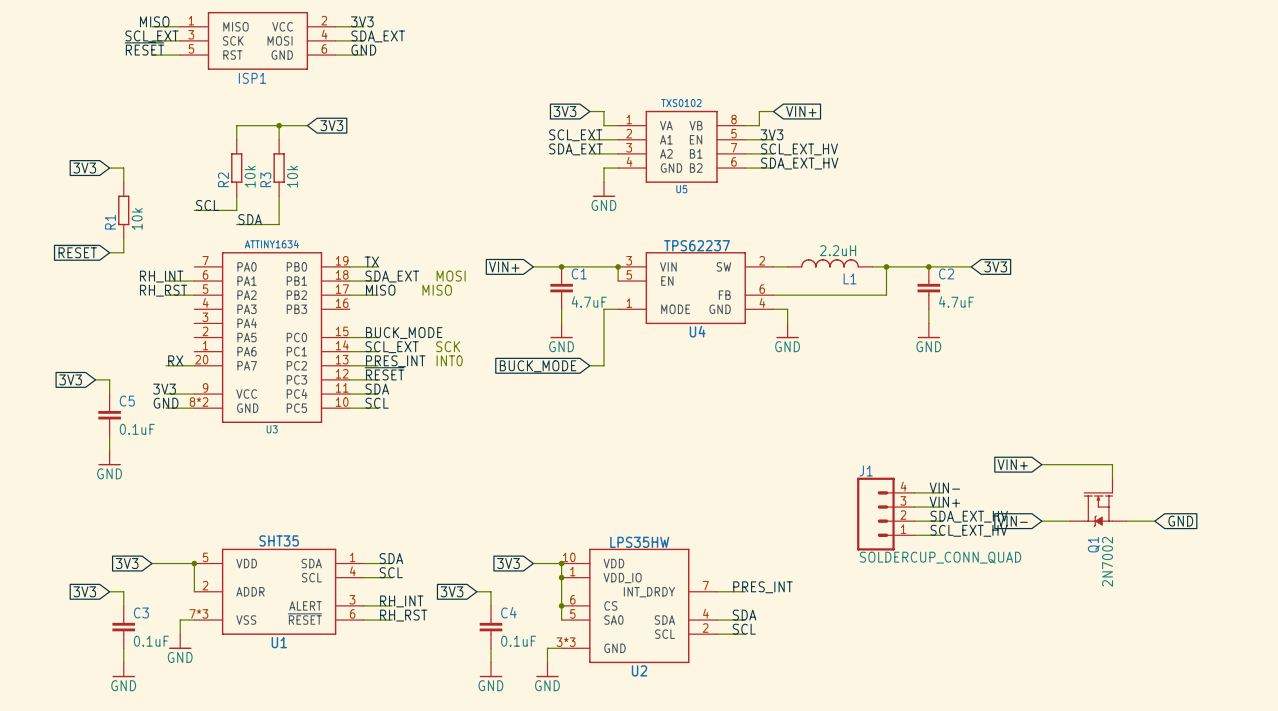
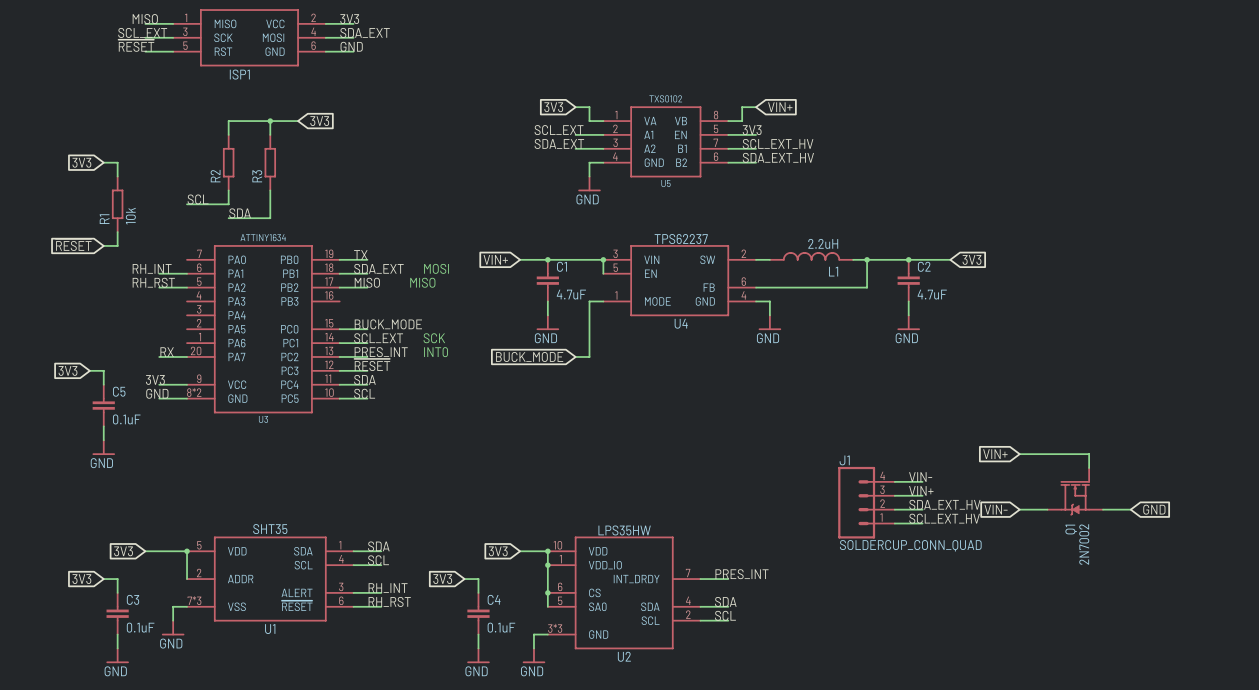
R2 value: 10k (250, 176) -> none
R3 value: 10k (292, 176) -> none

